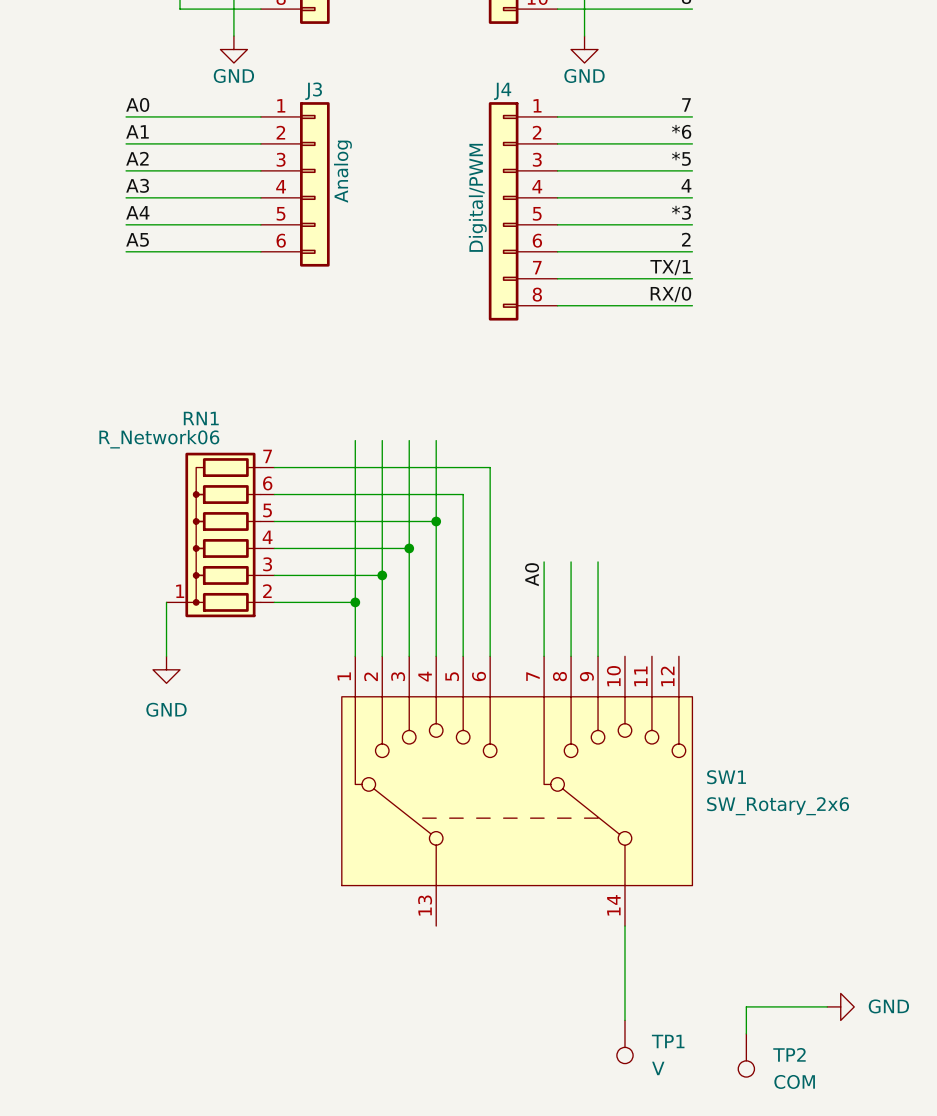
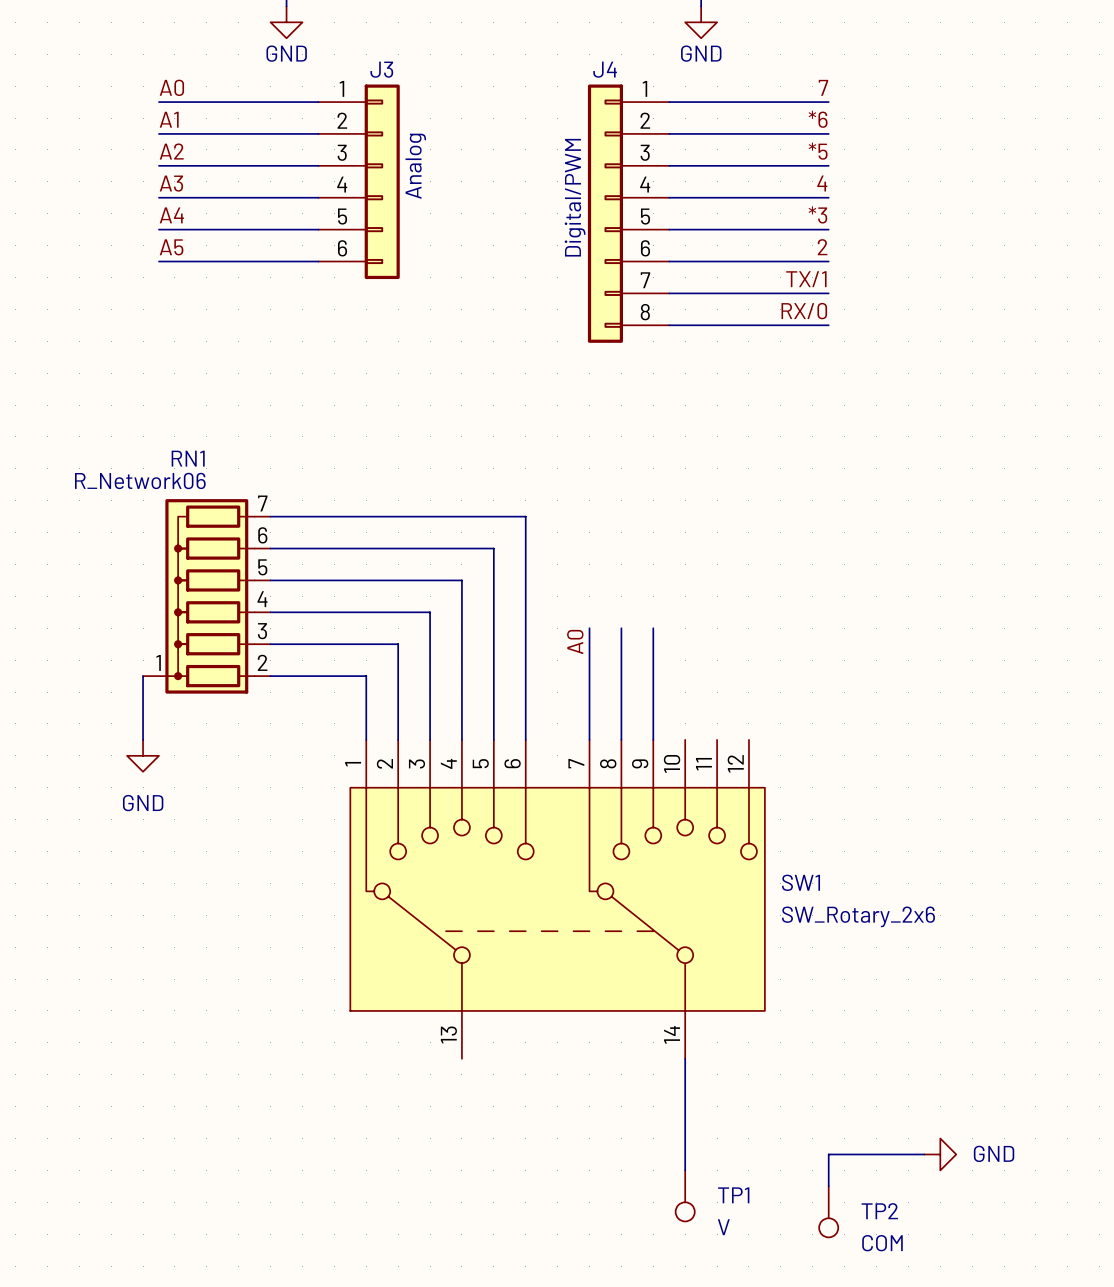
wire: (355, 440) (355, 548) (409, 548) -> none
wire: (382, 440) (382, 521) (436, 521) -> none
wire: (409, 440) (409, 494) (463, 494) (463, 656) -> none
wire: (436, 440) (436, 467) (490, 467) (490, 561) -> none
junction: (436, 521) -> none
RN1 position: (220, 534) -> (206, 596)
junction: (409, 548) -> none
wire: (571, 561) (571, 656) -> (621, 628) (621, 739)
wire: (598, 561) (598, 656) -> none
label position: A0 (532, 574) -> A0 (575, 642)
wire: (328, 575) (382, 575) -> (398, 644) (398, 739)
junction: (382, 575) -> none
wire: (166, 602) (166, 656) -> (143, 676) (143, 739)
wire: (301, 602) (355, 602) -> (366, 676) (366, 739)
junction: (355, 602) -> none
power symbol position: GND (166, 669) -> GND (143, 755)
SW1 position: (517, 791) -> (557, 899)
wire: (624, 926) (624, 1020) -> (685, 1058) (685, 1170)
wire: (746, 1006) (746, 1033) -> (892, 1154) (828, 1154) (828, 1186)
wire: (773, 1006) (827, 1006) -> none
power symbol position: GND (840, 1006) -> GND (940, 1154)
TP1 position: (624, 1041) -> (685, 1195)
TP2 position: (746, 1055) -> (828, 1211)

